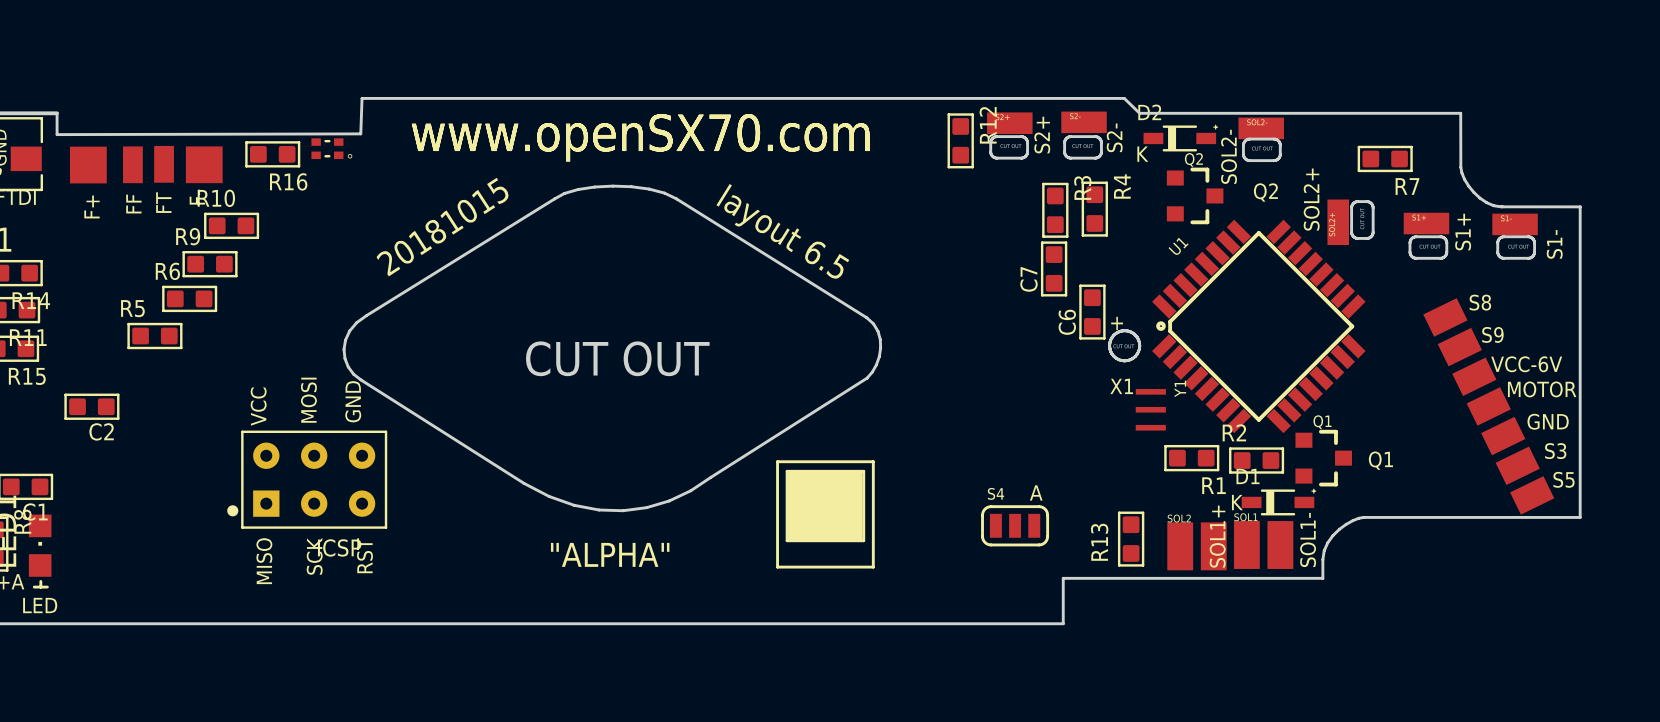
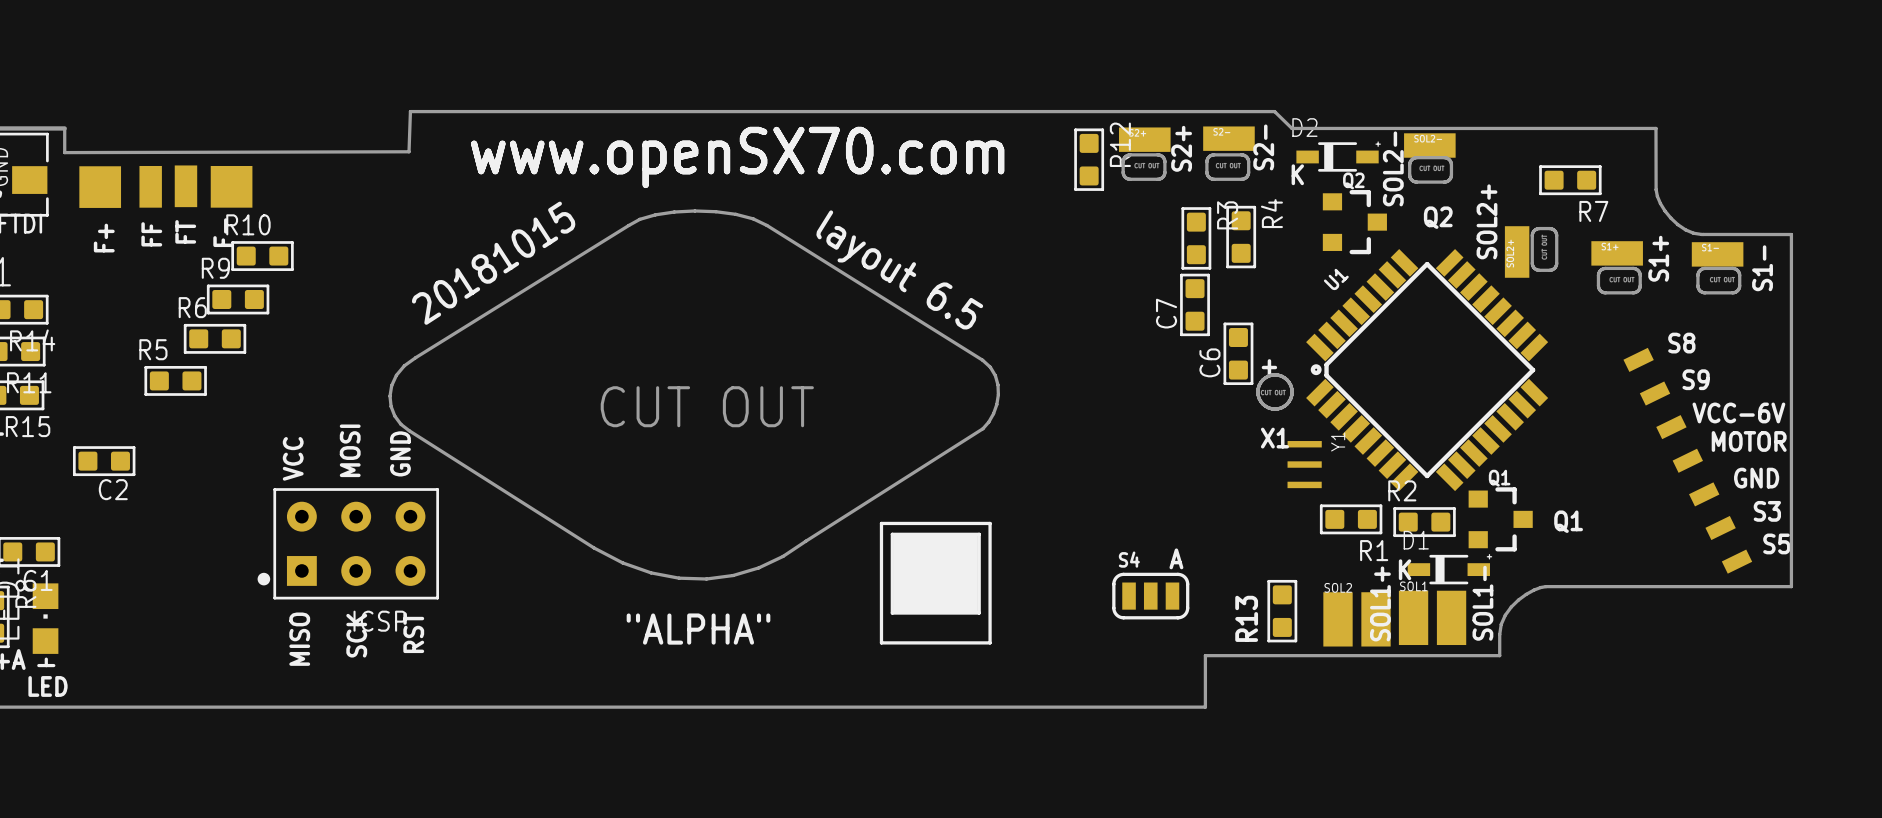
part: (331, 148) -> none
R16: (272, 154) -> none
part footprint: [1423, 298, 1555, 515] -> [1623, 347, 1753, 574]

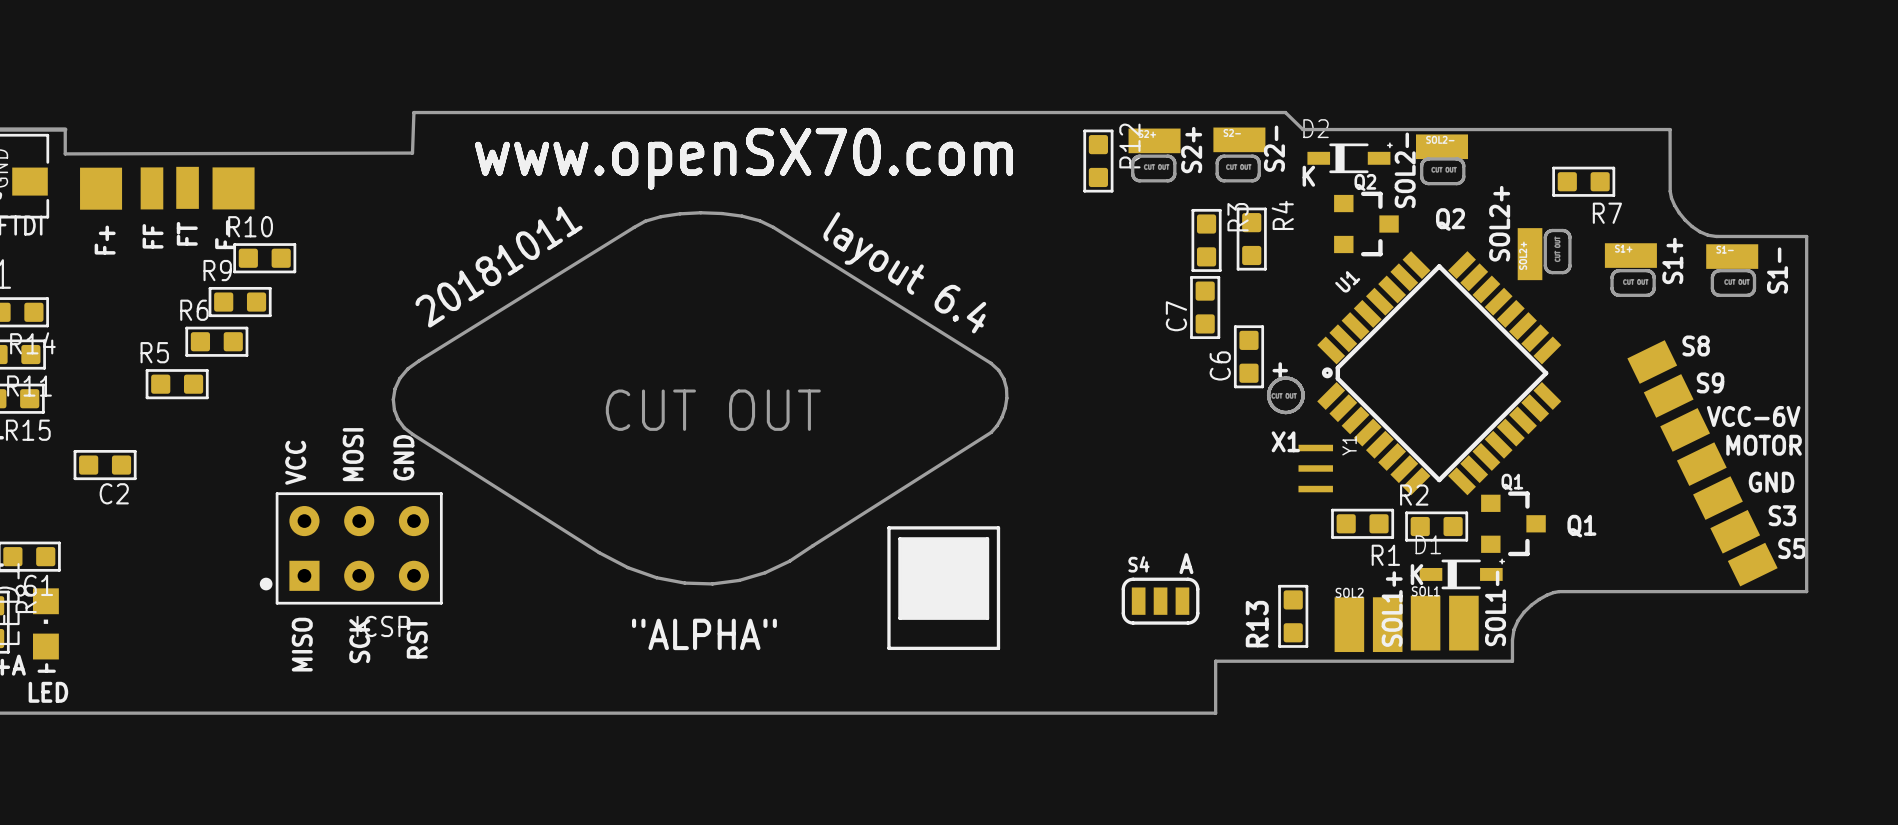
text: 20181015 (493, 263) -> 20181011 (499, 267)
text: layout 6.5 (899, 269) -> layout 6.4 (904, 272)
part footprint: [1623, 347, 1753, 574] -> [1627, 340, 1778, 587]

